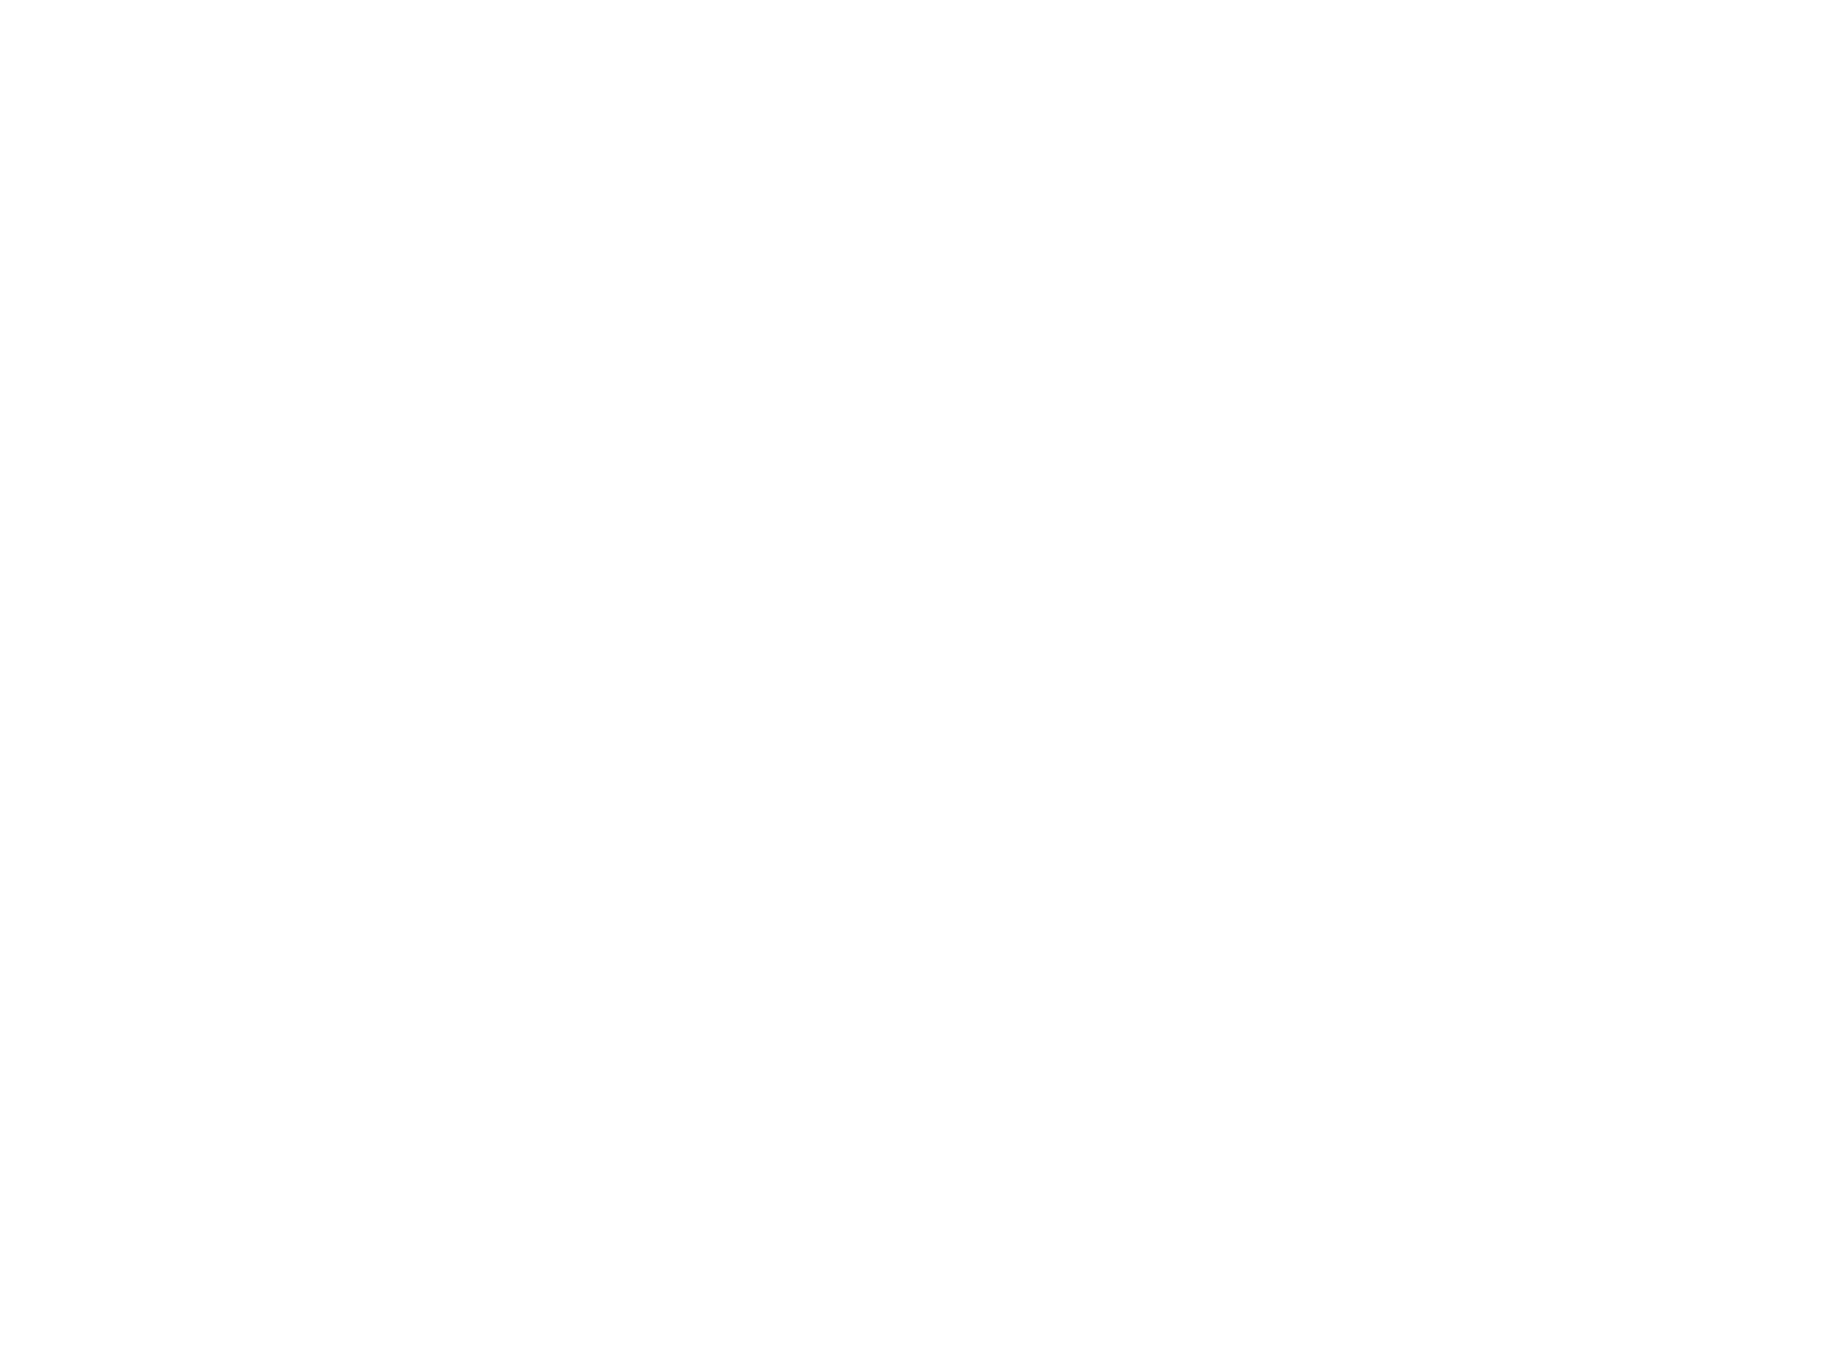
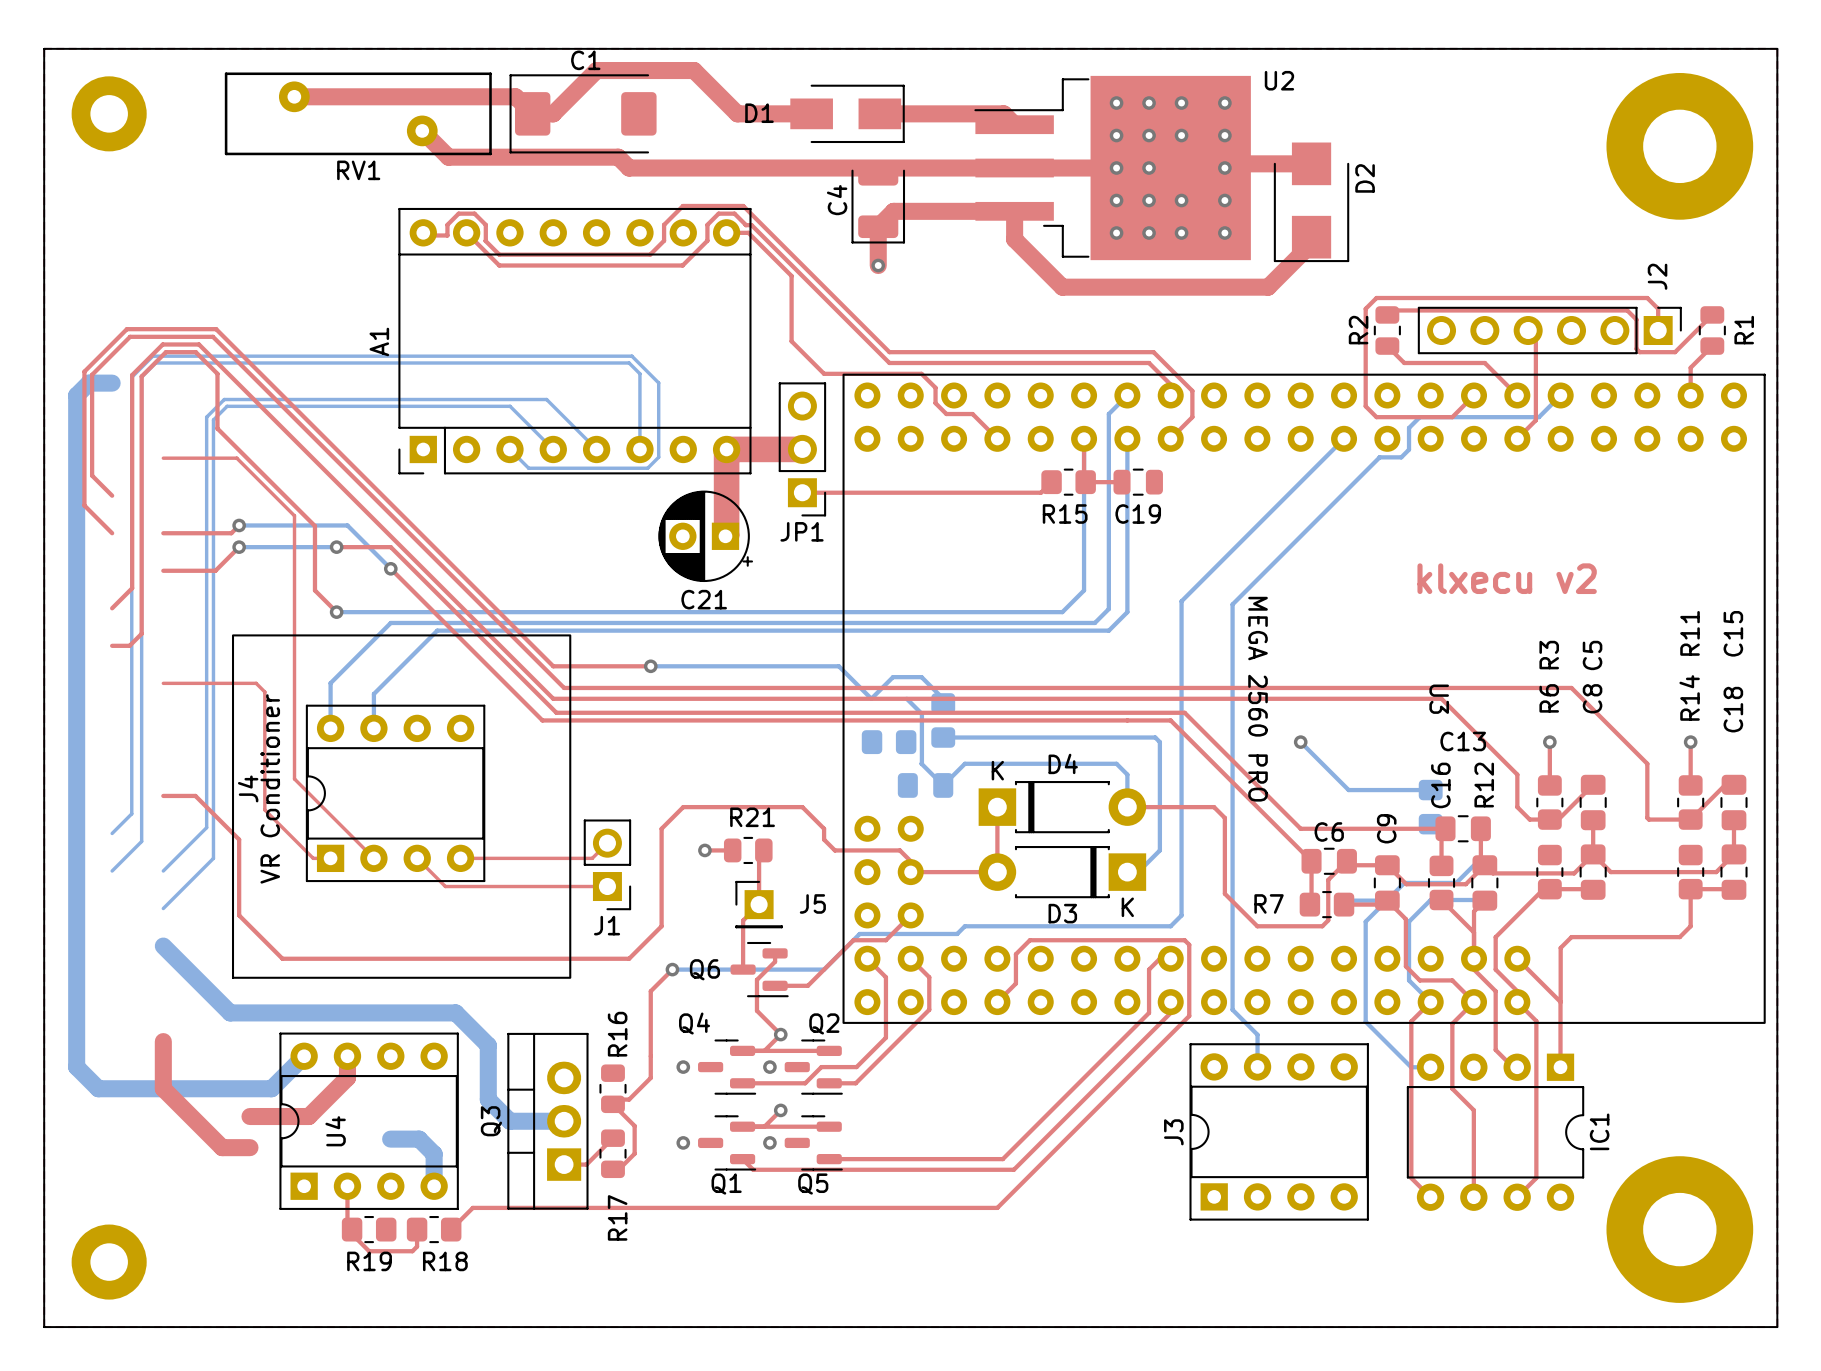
board edge: none -> (44, 48) (1777, 48) (1777, 1327) (44, 1327) (44, 48)
top track: none -> (294, 96) (515, 96) (532, 113) (553, 113) (596, 70) (694, 70) (737, 113) (811, 113)
via: none -> (1116, 103)
via: none -> (1149, 103)
via: none -> (1181, 103)
via: none -> (1224, 103)
part: none -> (109, 113)
RV1: none -> (358, 113)
C1: none -> (583, 113)
D1: none -> (847, 113)
top track: none -> (879, 113) (1003, 113) (1014, 124)
top track: none -> (422, 130) (448, 157) (618, 157) (629, 168) (1170, 168) (1174, 163) (1311, 163)
via: none -> (1116, 135)
via: none -> (1149, 135)
via: none -> (1181, 135)
via: none -> (1224, 135)
part: none -> (1679, 146)
U2: none -> (1112, 168)
via: none -> (1116, 168)
via: none -> (1149, 168)
via: none -> (1224, 168)
via: none -> (1116, 200)
via: none -> (1149, 200)
via: none -> (1181, 200)
via: none -> (1224, 200)
D2: none -> (1311, 202)
C4: none -> (878, 203)
top track: none -> (745, 224) (734, 213) (718, 213) (707, 224) (707, 240) (682, 265) (499, 265) (466, 232)
top track: none -> (745, 225) (751, 225) (889, 362) (1149, 362) (1170, 384) (1170, 395)
top track: none -> (423, 232) (425, 235) (447, 235) (447, 224) (458, 213) (474, 213) (485, 224) (485, 240)
top track: none -> (726, 232) (748, 232) (791, 276) (791, 341) (824, 373) (921, 373) (935, 387) (935, 403) (946, 414) (972, 414) (997, 438)
via: none -> (1116, 233)
via: none -> (1149, 233)
via: none -> (1181, 233)
via: none -> (1224, 233)
top track: none -> (1311, 237) (1311, 243) (1268, 287) (1062, 287) (1014, 239) (1014, 211) (893, 211) (878, 226) (878, 265)
top track: none -> (485, 240) (499, 254) (650, 254) (664, 240) (664, 224) (682, 205) (743, 205) (889, 352) (1153, 352) (1192, 390) (1192, 417) (1170, 438)
via: none -> (878, 265)
top track: none -> (1387, 314) (1391, 310) (1627, 310) (1636, 319) (1636, 348) (1639, 352) (1675, 352) (1712, 314)
R2: none -> (1387, 330)
top track: none -> (1528, 330) (1535, 338) (1535, 420) (1517, 438)
J2: none -> (1549, 330)
top track: none -> (1658, 330) (1658, 308) (1647, 298) (1376, 298) (1365, 308) (1365, 406) (1376, 417) (1452, 417) (1474, 395)
R1: none -> (1712, 330)
A1: none -> (574, 341)
top track: none -> (1387, 346) (1404, 362) (1484, 362) (1517, 395)
top track: none -> (1712, 346) (1690, 367) (1690, 395)
bottom track: none -> (112, 383) (89, 383) (76, 395) (76, 1067) (98, 1088) (271, 1088) (304, 1056)
bottom track: none -> (1127, 395) (1108, 414) (1108, 609) (1094, 622) (390, 622) (330, 683) (330, 728)
bottom track: none -> (1560, 395) (1539, 417) (1419, 417) (1409, 427) (1409, 449) (1401, 457) (1379, 457) (1232, 604) (1232, 1009) (1257, 1034) (1257, 1066)
top track: none -> (1084, 438) (1084, 480) (1085, 482) (1122, 482)
bottom track: none -> (1084, 438) (1084, 590) (1062, 612) (336, 612)
bottom track: none -> (1127, 438) (1127, 612) (1108, 630) (437, 630) (373, 694) (373, 728)
bottom track: none -> (1344, 438) (1181, 601) (1181, 915) (1170, 926) (964, 926) (957, 933) (859, 933) (824, 969) (672, 969)
bottom track: none -> (509, 449) (528, 468) (647, 468) (658, 457) (658, 382) (631, 356) (152, 356) (131, 377) (131, 813) (112, 833)
bottom track: none -> (553, 449) (510, 406) (227, 406) (213, 419) (213, 858) (163, 908)
bottom track: none -> (596, 449) (546, 399) (224, 399) (206, 417) (206, 827) (163, 871)
bottom track: none -> (639, 449) (639, 373) (629, 362) (155, 362) (141, 377) (141, 841) (112, 871)
top track: none -> (726, 449) (802, 449)
top track: none -> (726, 449) (725, 536)
JP1: none -> (802, 449)
top track: none -> (163, 458) (236, 458) (294, 515) (294, 778) (373, 858)
top track: none -> (1051, 482) (1040, 492) (802, 492)
R15: none -> (1068, 482)
C19: none -> (1138, 482)
top track: none -> (112, 495) (92, 475) (92, 374) (130, 336) (212, 336) (564, 687) (1571, 687) (1647, 763) (1647, 817) (1648, 819) (1690, 819) (1725, 784) (1733, 784)
top track: none -> (239, 525) (231, 533) (163, 533)
bottom track: none -> (239, 525) (347, 525) (390, 568)
via: none -> (239, 525)
top track: none -> (112, 533) (84, 505) (84, 371) (126, 329) (216, 329) (553, 666) (650, 666)
C21: none -> (705, 536)
top track: none -> (239, 547) (215, 570) (163, 570)
bottom track: none -> (239, 547) (336, 547)
via: none -> (239, 547)
top track: none -> (336, 547) (390, 547) (556, 712) (1184, 712) (1300, 828) (1445, 828) (1441, 832) (1441, 865)
via: none -> (336, 547)
top track: none -> (390, 568) (542, 720) (1170, 720) (1311, 861) (1311, 902) (1309, 904)
via: none -> (390, 568)
text: none -> klxecu v2 (1507, 578)
top track: none -> (112, 608) (132, 588) (132, 375) (162, 344) (199, 344) (553, 698) (1441, 698) (1517, 774) (1517, 807) (1529, 819) (1558, 819) (1593, 784)
top track: none -> (336, 612) (314, 590) (314, 526) (217, 428) (217, 373) (195, 352) (165, 352) (141, 376) (141, 633) (129, 645) (112, 645)
via: none -> (336, 612)
bottom track: none -> (650, 666) (838, 666) (871, 698) (893, 677) (921, 677) (943, 698) (943, 703)
via: none -> (650, 666)
top track: none -> (163, 683) (256, 683) (264, 691) (264, 809) (313, 858) (330, 858)
bottom track: none -> (906, 698) (921, 713) (921, 763) (943, 785) (964, 763) (1116, 763) (1127, 774) (1127, 807)
U3: none -> (1304, 698)
part: none -> (943, 720)
bottom track: none -> (943, 737) (1155, 737) (1159, 742) (1159, 850) (1138, 872) (1127, 872)
part: none -> (889, 742)
bottom track: none -> (1300, 742) (1348, 790) (1430, 790)
via: none -> (1300, 742)
top track: none -> (1549, 742) (1549, 785)
via: none -> (1549, 742)
top track: none -> (1690, 742) (1690, 785)
via: none -> (1690, 742)
part: none -> (925, 785)
top track: none -> (163, 795) (195, 795) (239, 839) (239, 915) (282, 958) (629, 958) (661, 926) (661, 828) (683, 807) (802, 807) (824, 828) (824, 839) (834, 850) (899, 850) (910, 861) (910, 872) (997, 872) (997, 807)
R3: none -> (1549, 802)
C5: none -> (1593, 802)
R11: none -> (1690, 802)
C15: none -> (1733, 802)
J4: none -> (401, 806)
D4: none -> (1062, 807)
top track: none -> (1127, 807) (1214, 807) (1224, 817) (1224, 893) (1257, 926) (1322, 926) (1328, 920) (1328, 879) (1346, 861) (1350, 865) (1387, 865) (1406, 884) (1465, 884) (1484, 865)
part: none -> (1430, 807)
top track: none -> (1593, 820) (1593, 854)
top track: none -> (1733, 820) (1733, 854) (1716, 872) (1610, 872) (1593, 854)
C13: none -> (1463, 828)
top track: none -> (1480, 828) (1480, 861) (1493, 873) (1574, 873) (1593, 854)
top track: none -> (607, 843) (592, 858) (460, 858)
top track: none -> (704, 850) (732, 850)
via: none -> (704, 850)
R21: none -> (748, 850)
top track: none -> (417, 858) (445, 886) (607, 886)
top track: none -> (759, 859) (759, 904) (743, 920) (743, 969)
C6: none -> (1329, 861)
J1: none -> (607, 864)
bottom track: none -> (1474, 865) (1456, 882) (1404, 882) (1365, 921) (1365, 1021) (1411, 1067) (1430, 1067)
D3: none -> (1062, 872)
R6: none -> (1549, 872)
C8: none -> (1593, 872)
R14: none -> (1690, 872)
C18: none -> (1733, 872)
C9: none -> (1387, 882)
R12: none -> (1441, 882)
C16: none -> (1484, 882)
top track: none -> (1593, 889) (1543, 889) (1495, 937) (1495, 969) (1517, 991) (1517, 1002) (1536, 1021) (1536, 1178) (1517, 1197)
top track: none -> (1733, 889) (1690, 889) (1690, 926) (1679, 937) (1571, 937) (1560, 947) (1560, 1001)
bottom track: none -> (1344, 900) (1386, 900)
top track: none -> (1441, 900) (1474, 932)
bottom track: none -> (1474, 900) (1430, 900) (1409, 921) (1409, 980) (1430, 1002)
top track: none -> (1484, 900) (1474, 911) (1474, 969) (1495, 991) (1495, 1049) (1512, 1067) (1517, 1067)
J5: none -> (759, 904)
R7: none -> (1326, 904)
top track: none -> (1344, 904) (1383, 904) (1387, 900) (1405, 919) (1405, 966) (1419, 980) (1452, 980) (1474, 1002) (1452, 1023) (1452, 1088) (1473, 1110) (1473, 1197)
top track: none -> (910, 915) (885, 940) (853, 940) (807, 985) (775, 985)
bottom track: none -> (163, 946) (230, 1012) (455, 1012) (488, 1045) (488, 1099) (509, 1121) (564, 1121)
top track: none -> (775, 953) (775, 961) (756, 979) (756, 1010) (780, 1034) (764, 1050)
top track: none -> (867, 958) (885, 977) (885, 1037) (856, 1067) (821, 1067) (805, 1083) (742, 1083)
top track: none -> (910, 958) (929, 977) (929, 1009) (855, 1083) (829, 1083)
top track: none -> (1170, 958) (1159, 958) (1149, 969) (1149, 1012) (1002, 1159) (829, 1159)
top track: none -> (1517, 958) (1560, 1001) (1560, 1067)
top track: none -> (672, 969) (650, 991) (650, 1077) (629, 1099) (617, 1099) (612, 1104) (634, 1125) (634, 1153) (619, 1169) (612, 1169)
via: none -> (672, 969)
Q6: none -> (759, 969)
top track: none -> (997, 1002) (1015, 983) (1015, 954) (1029, 940) (1184, 940) (1189, 944) (1189, 1016) (997, 1207) (472, 1207) (451, 1229)
top track: none -> (1170, 1002) (1170, 1012) (1013, 1169) (753, 1169) (742, 1159)
top track: none -> (1430, 1002) (1411, 1021) (1411, 1178) (1430, 1197)
via: none -> (780, 1034)
top track: none -> (163, 1041) (163, 1088) (222, 1147) (249, 1147)
top track: none -> (742, 1050) (829, 1050)
top track: none -> (347, 1056) (347, 1077) (308, 1116) (249, 1116)
via: none -> (683, 1067)
Q4: none -> (727, 1067)
via: none -> (769, 1067)
Q2: none -> (813, 1067)
R16: none -> (612, 1088)
top track: none -> (780, 1110) (764, 1126)
via: none -> (780, 1110)
U4: none -> (369, 1121)
Q3: none -> (547, 1121)
top track: none -> (742, 1126) (829, 1126)
J3: none -> (1279, 1131)
IC1: none -> (1495, 1132)
top track: none -> (612, 1138) (586, 1164) (564, 1164)
bottom track: none -> (390, 1139) (419, 1139) (434, 1154) (434, 1186)
via: none -> (683, 1142)
Q1: none -> (727, 1142)
via: none -> (769, 1142)
Q5: none -> (813, 1142)
R17: none -> (612, 1153)
top track: none -> (347, 1186) (347, 1224) (352, 1229) (352, 1234) (369, 1251) (412, 1251) (417, 1246) (417, 1229)
R19: none -> (369, 1229)
R18: none -> (434, 1229)
part: none -> (1679, 1229)
part: none -> (109, 1262)

